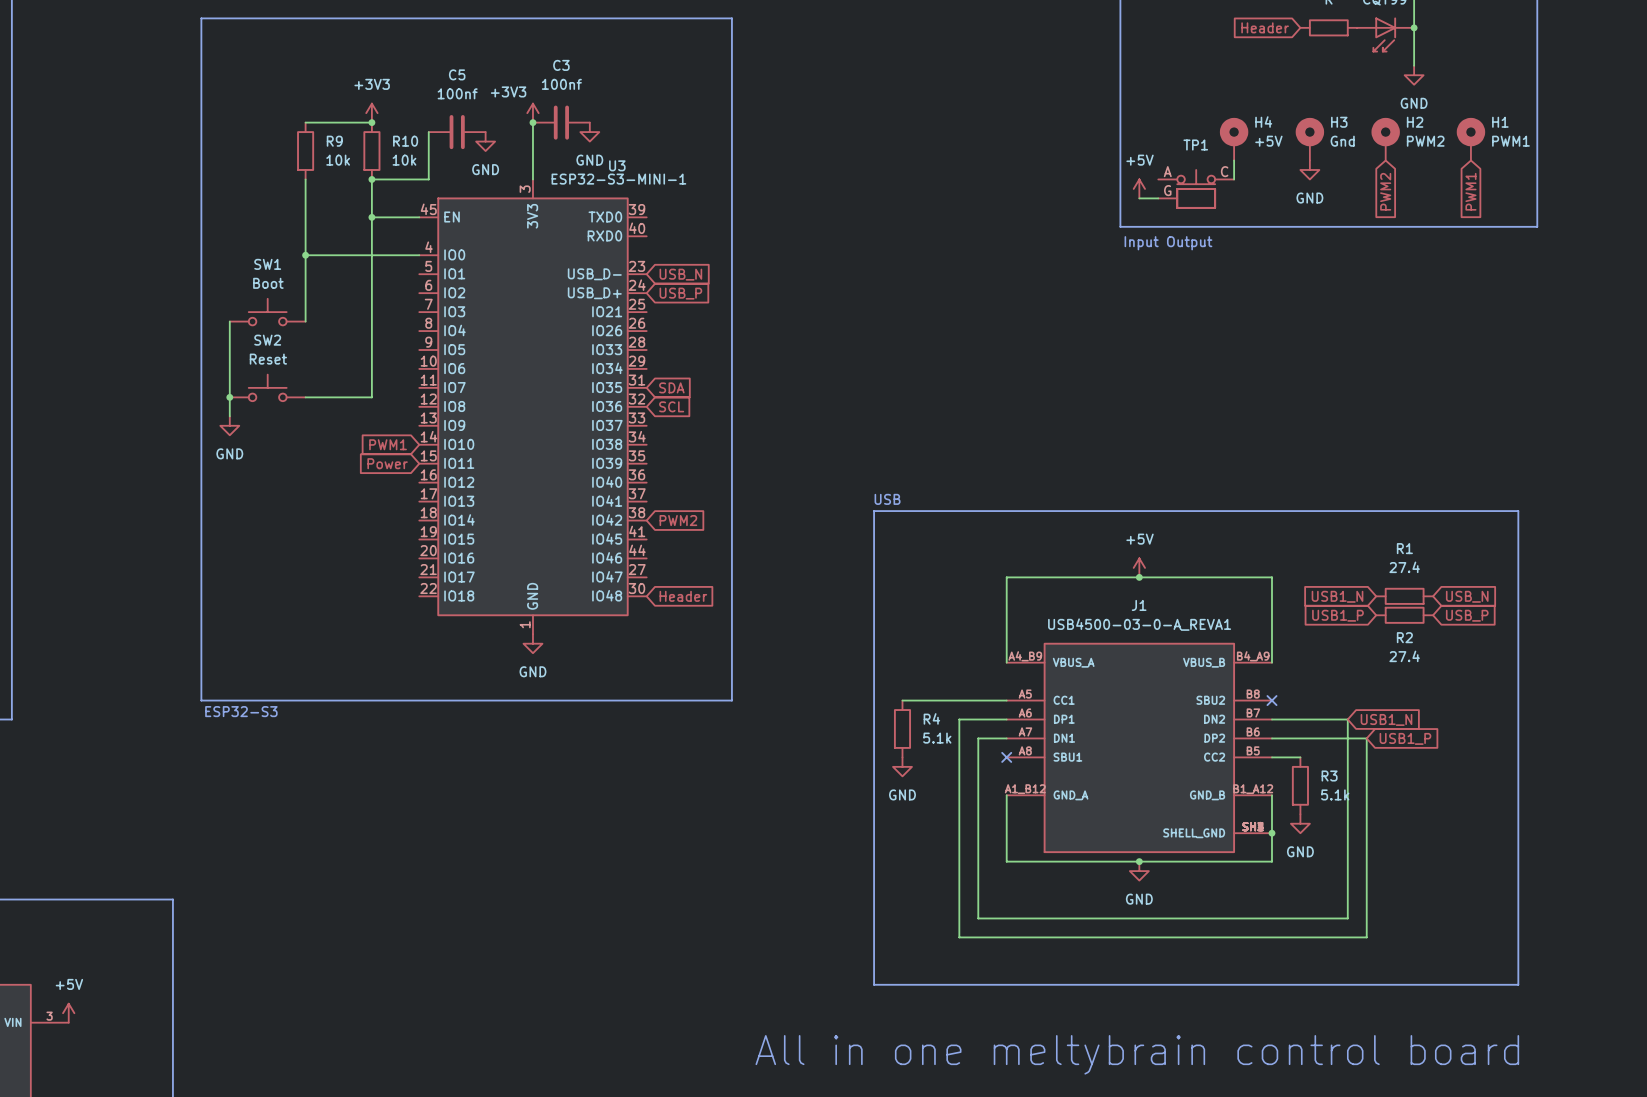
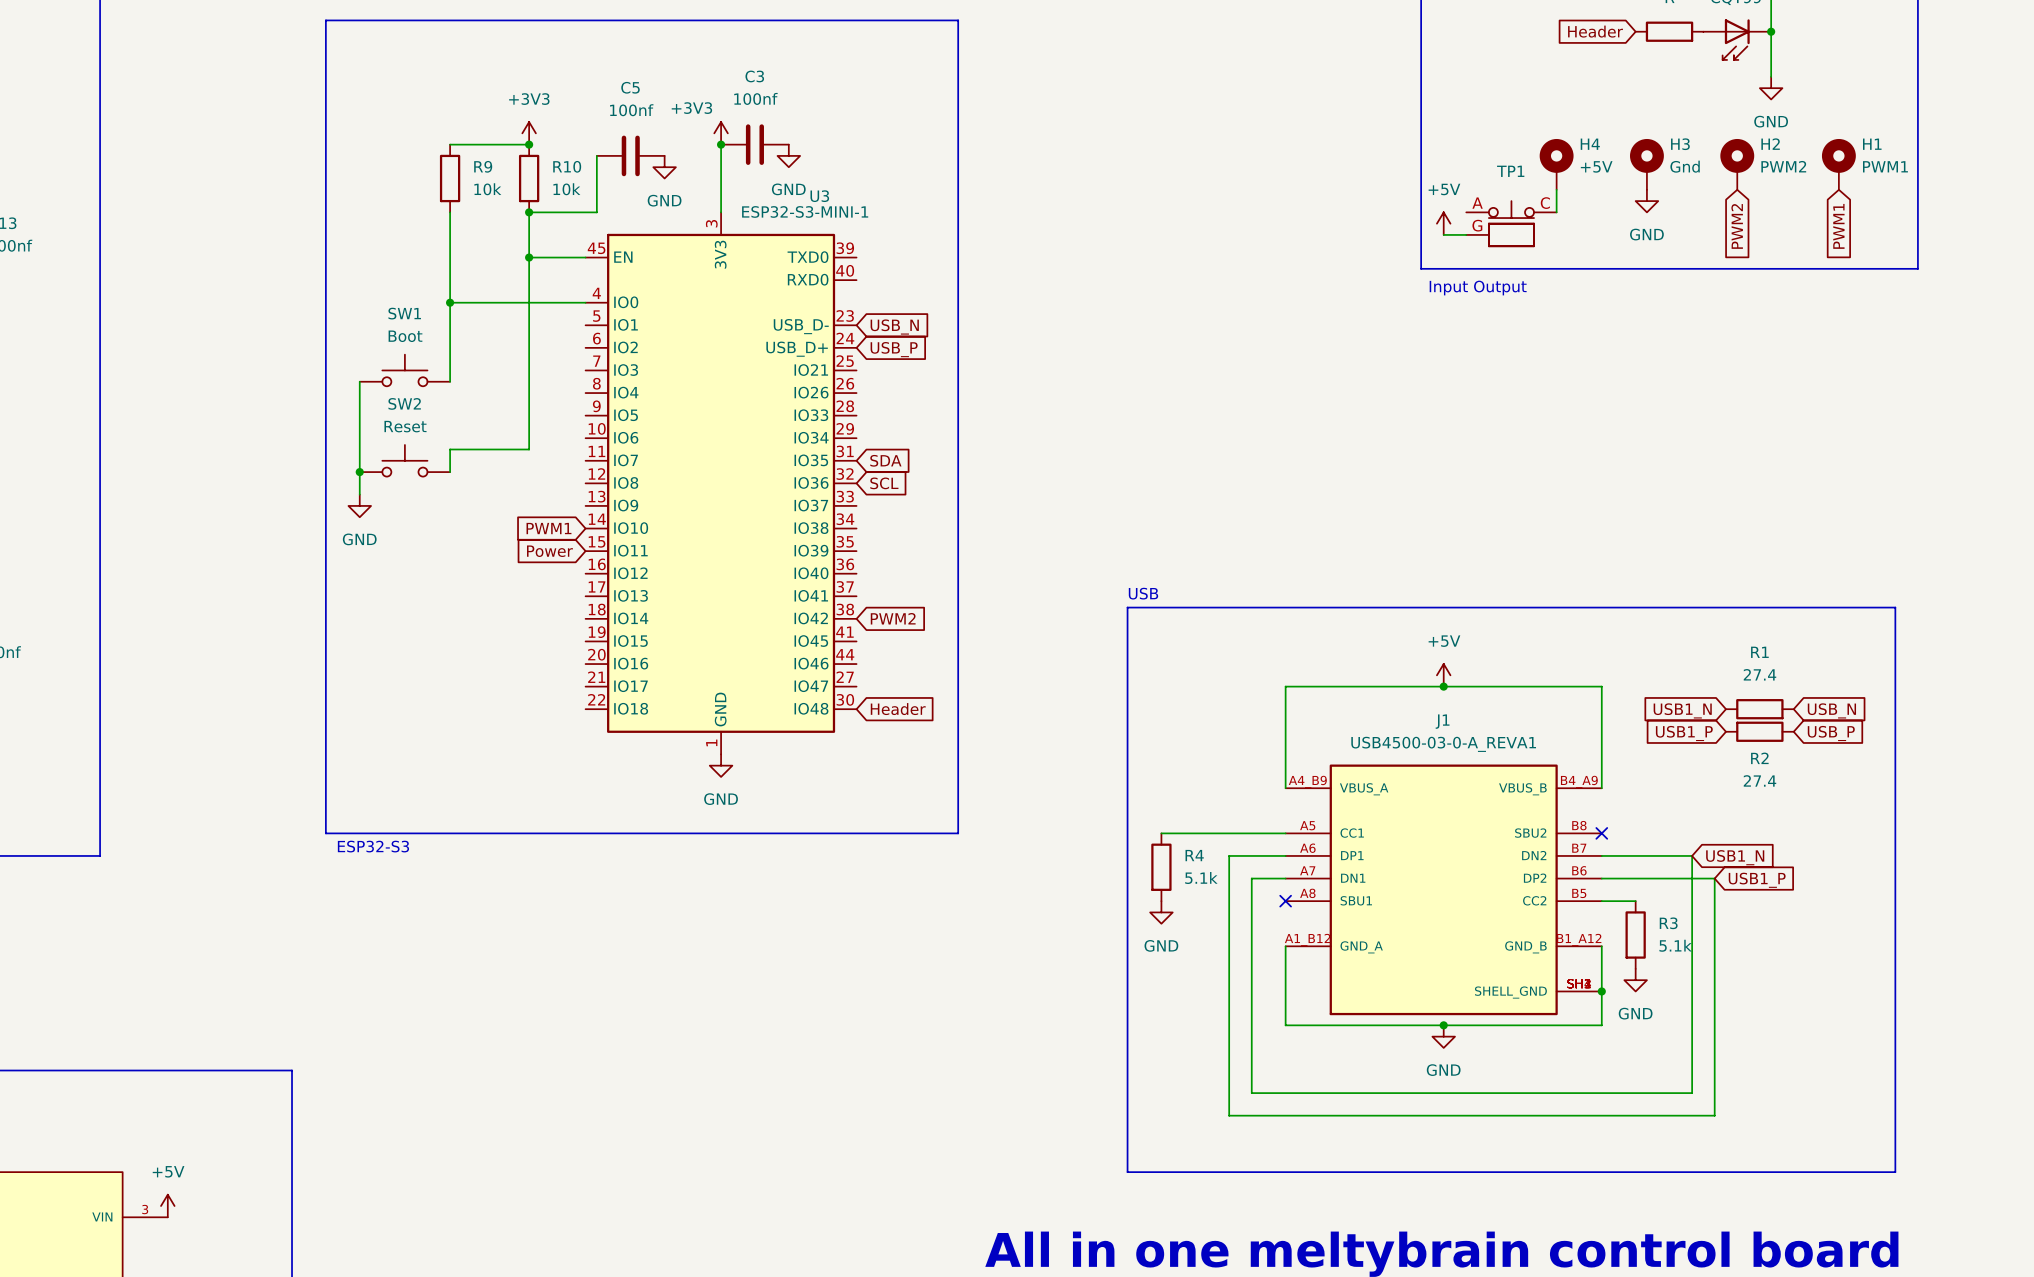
wire: (371, 378) (371, 397) (305, 397) -> (529, 449) (450, 449) (450, 472)

